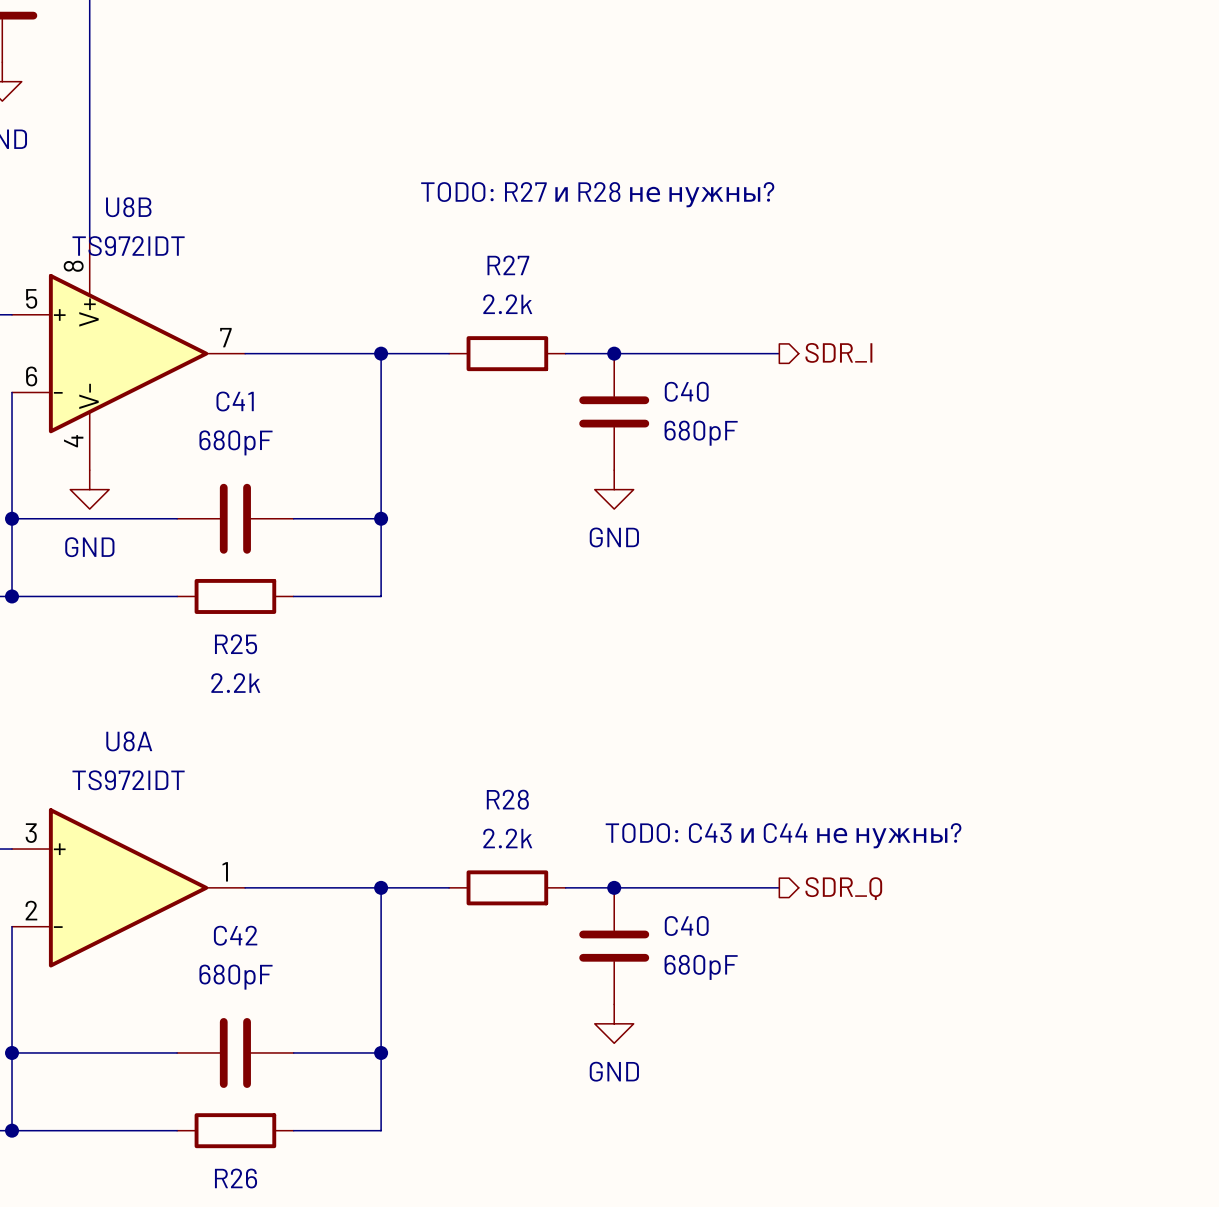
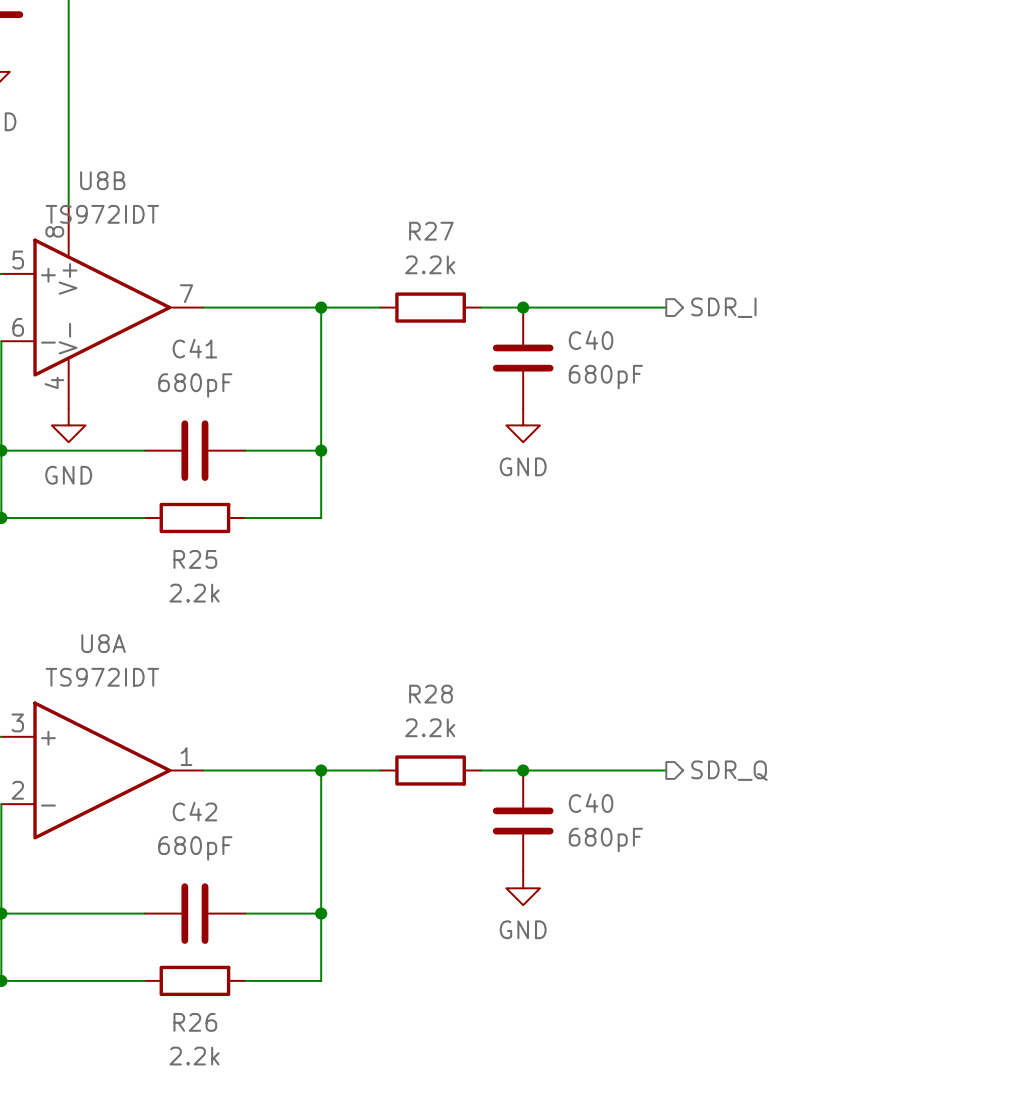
text: TODO: R27 и R28 не нужны? (597, 194) -> none
text: TODO: C43 и C44 не нужны? (783, 835) -> none

